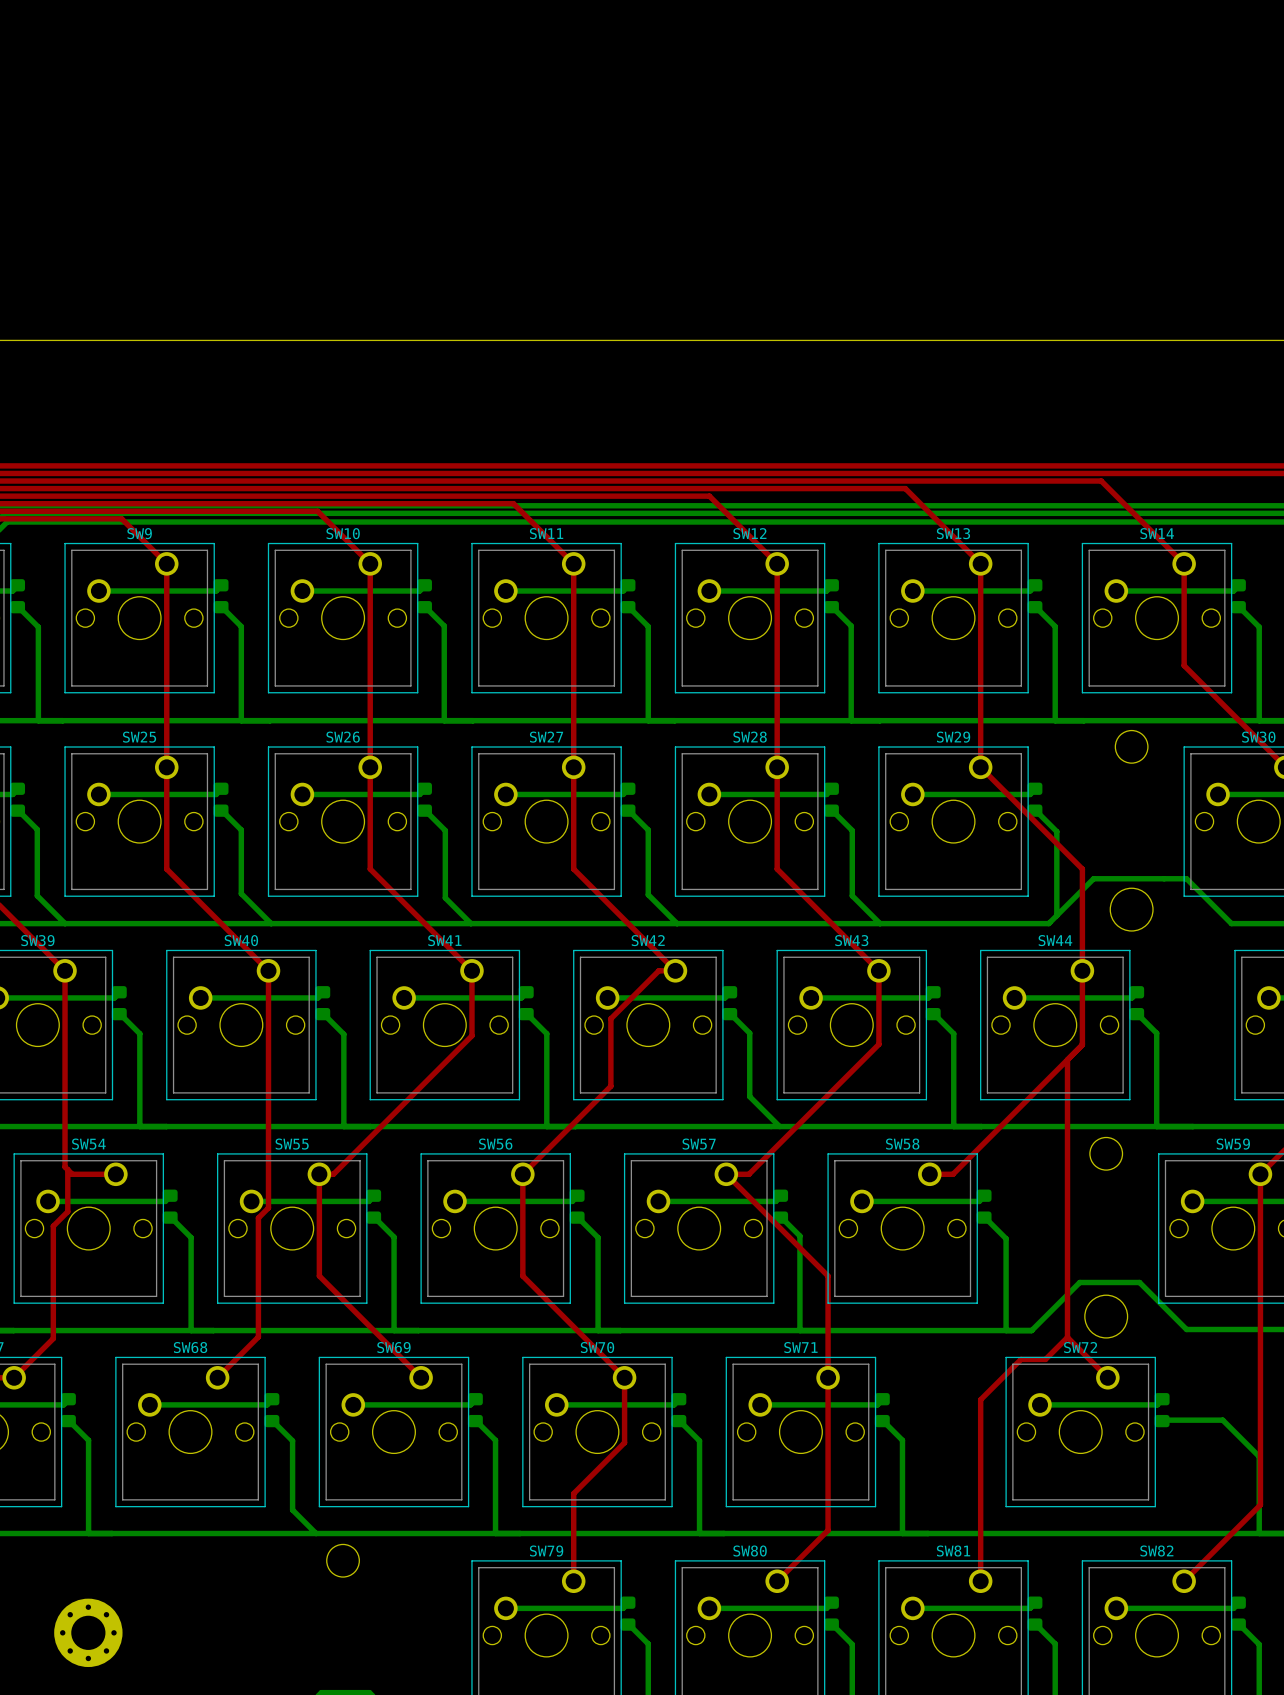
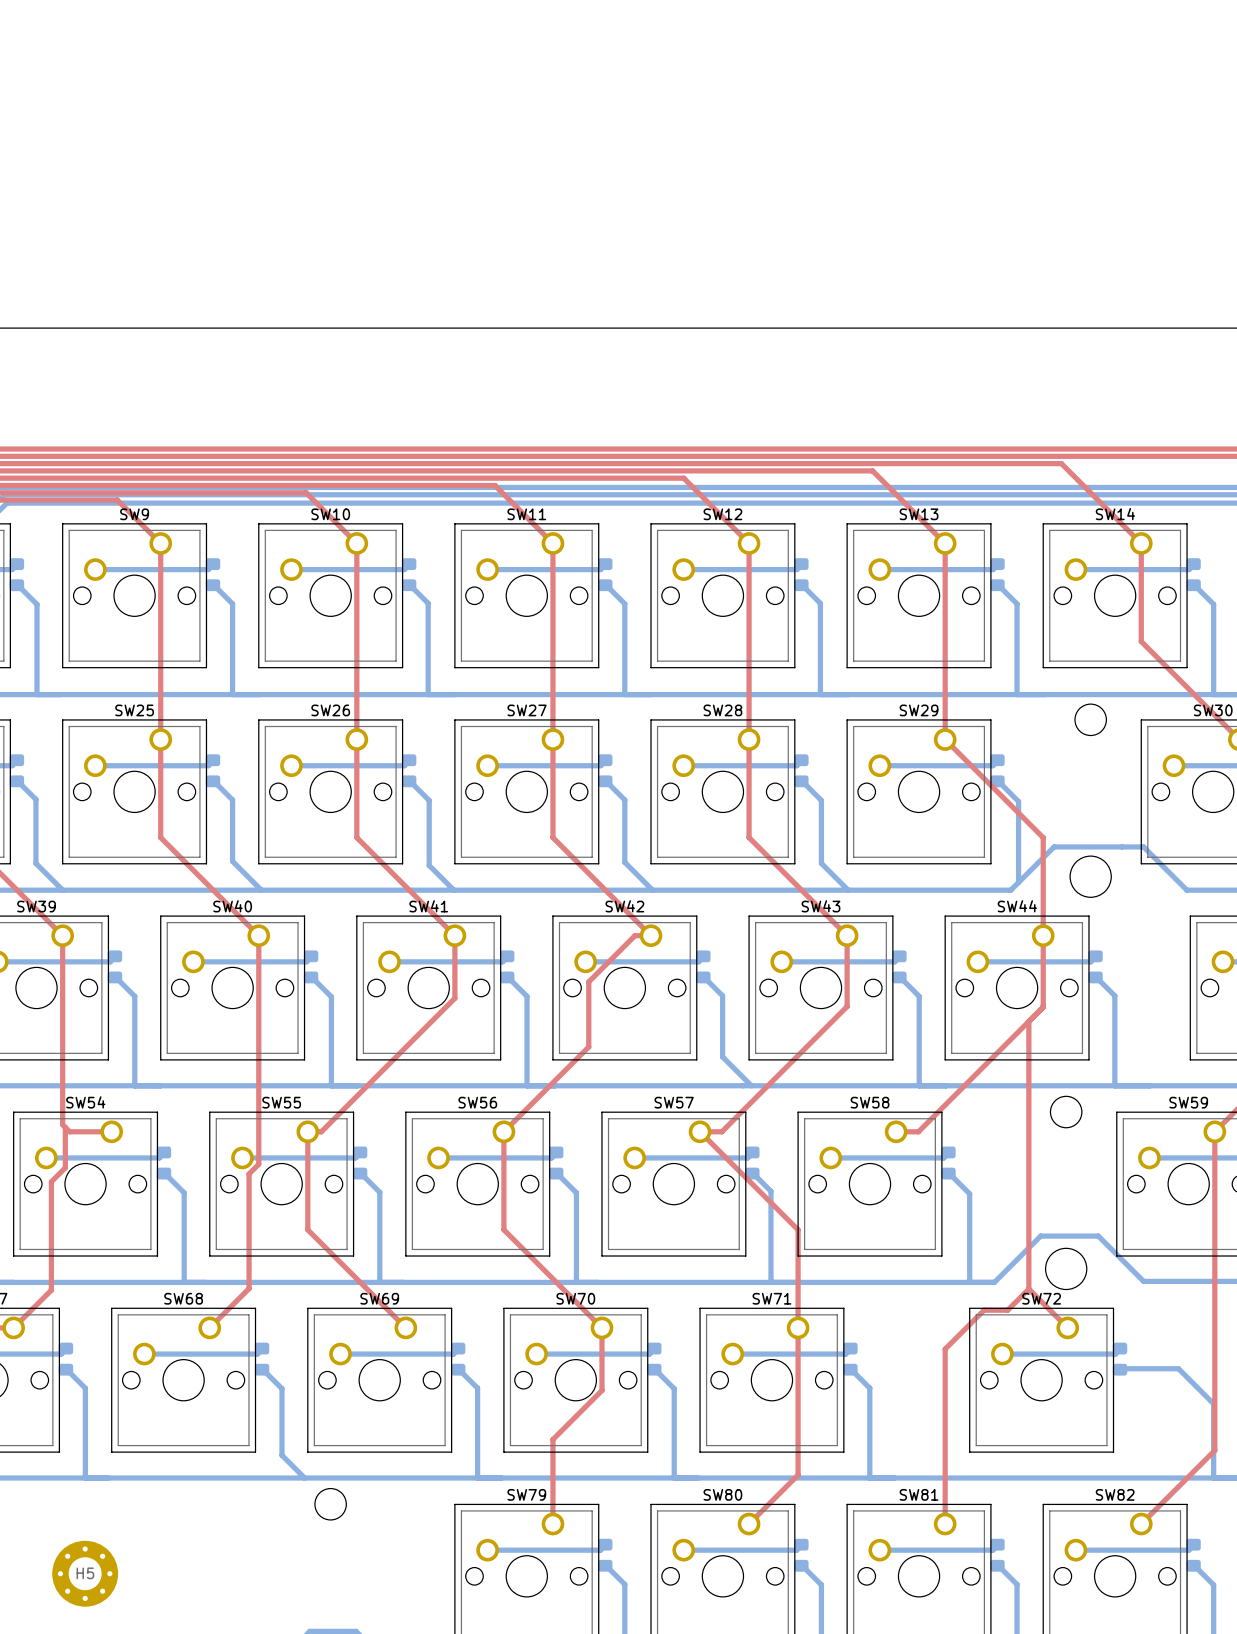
H5 name: none -> H5 (85, 1573)

